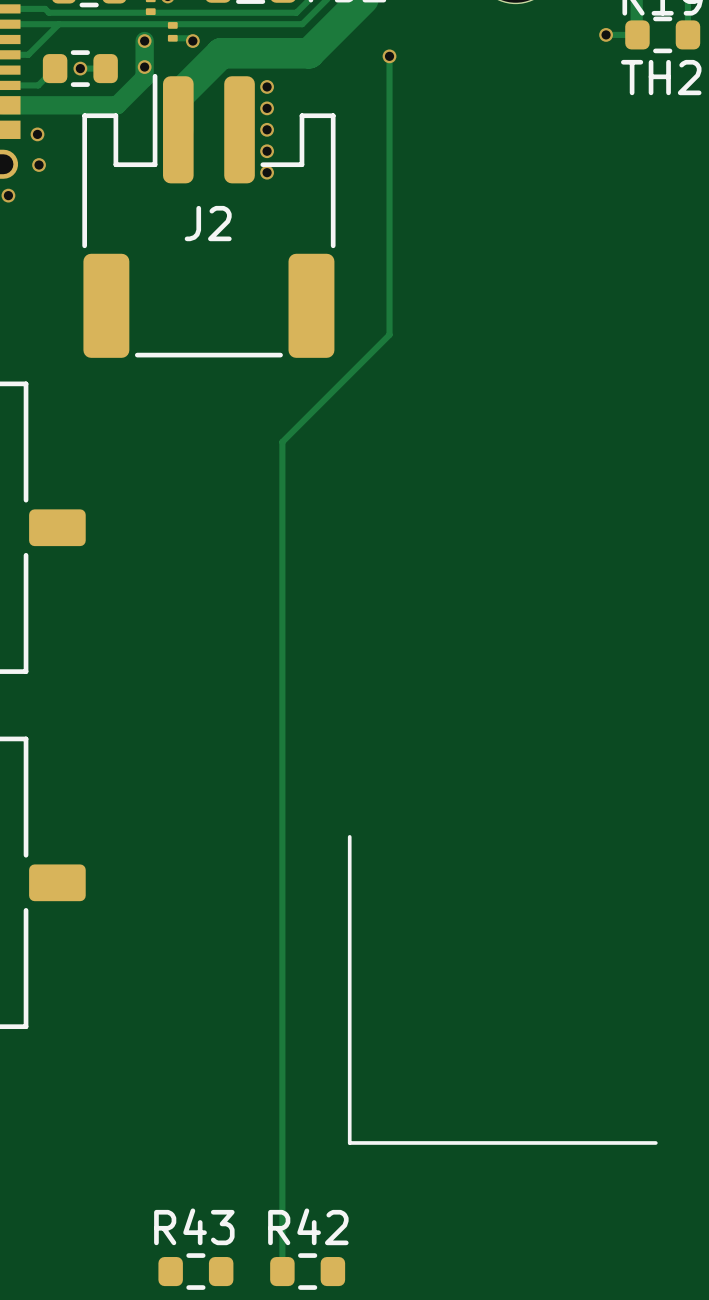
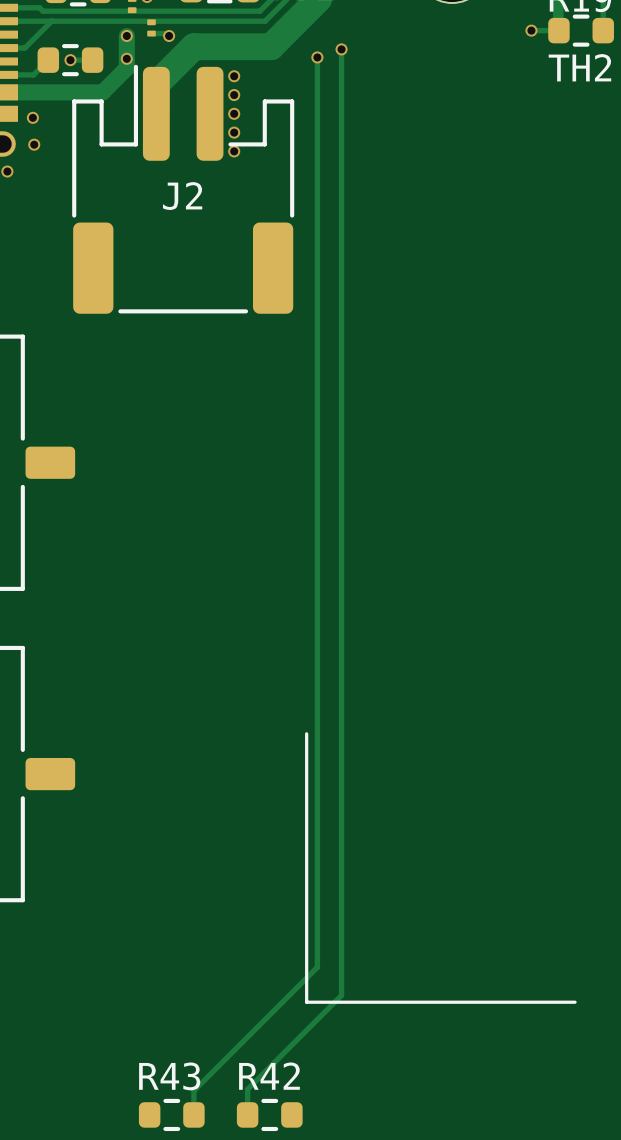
track: none -> (317, 57) (317, 967) (193, 1090) (193, 1114)
via: none -> (317, 57)
track: (389, 334) (282, 442) (282, 1242) -> (341, 293) (341, 995) (247, 1089)

